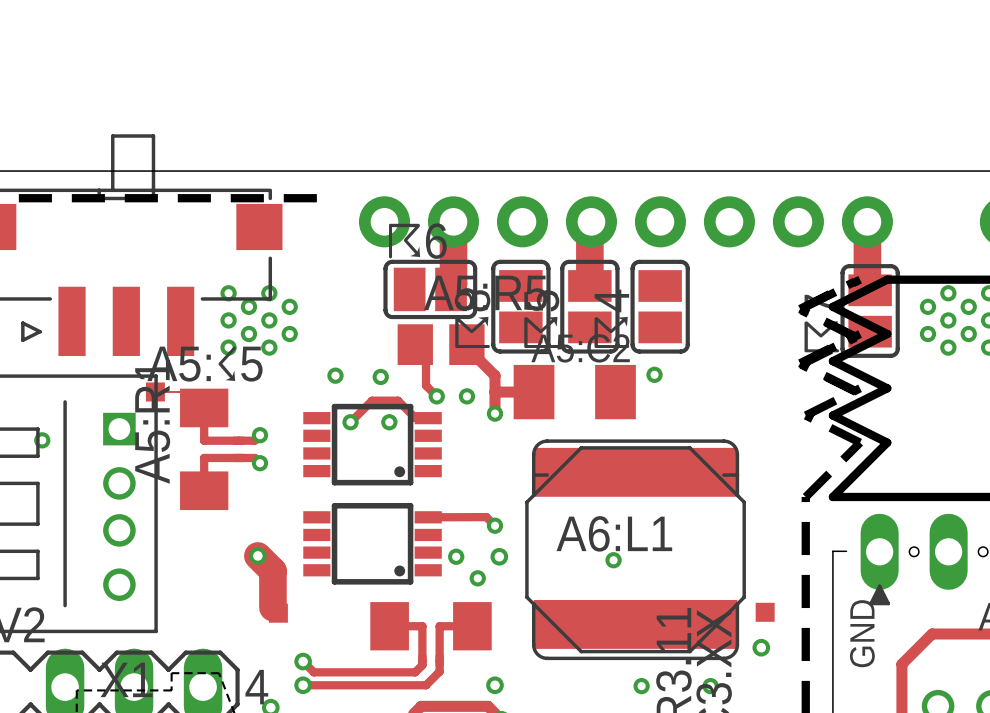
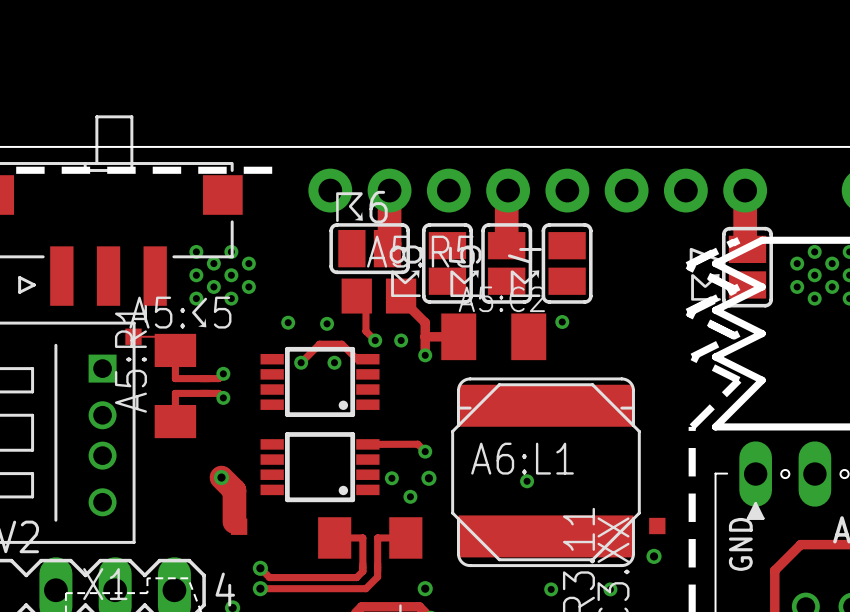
via: (42, 440) -> none

